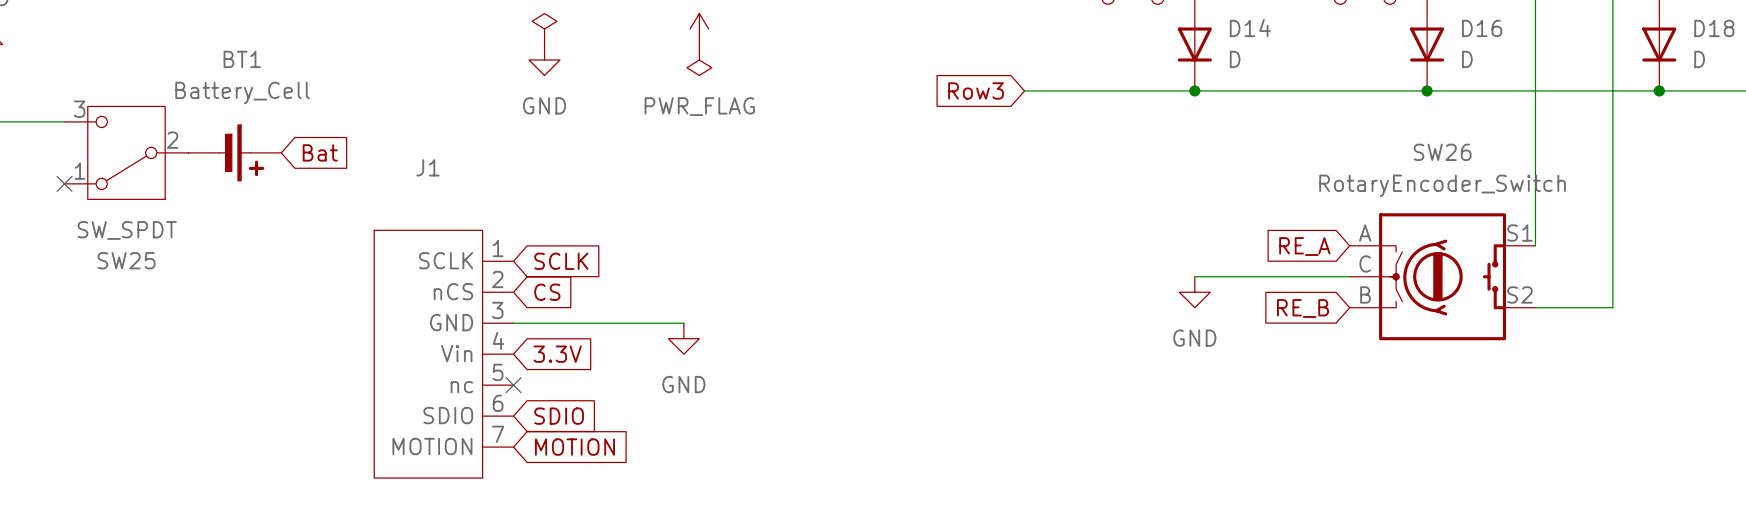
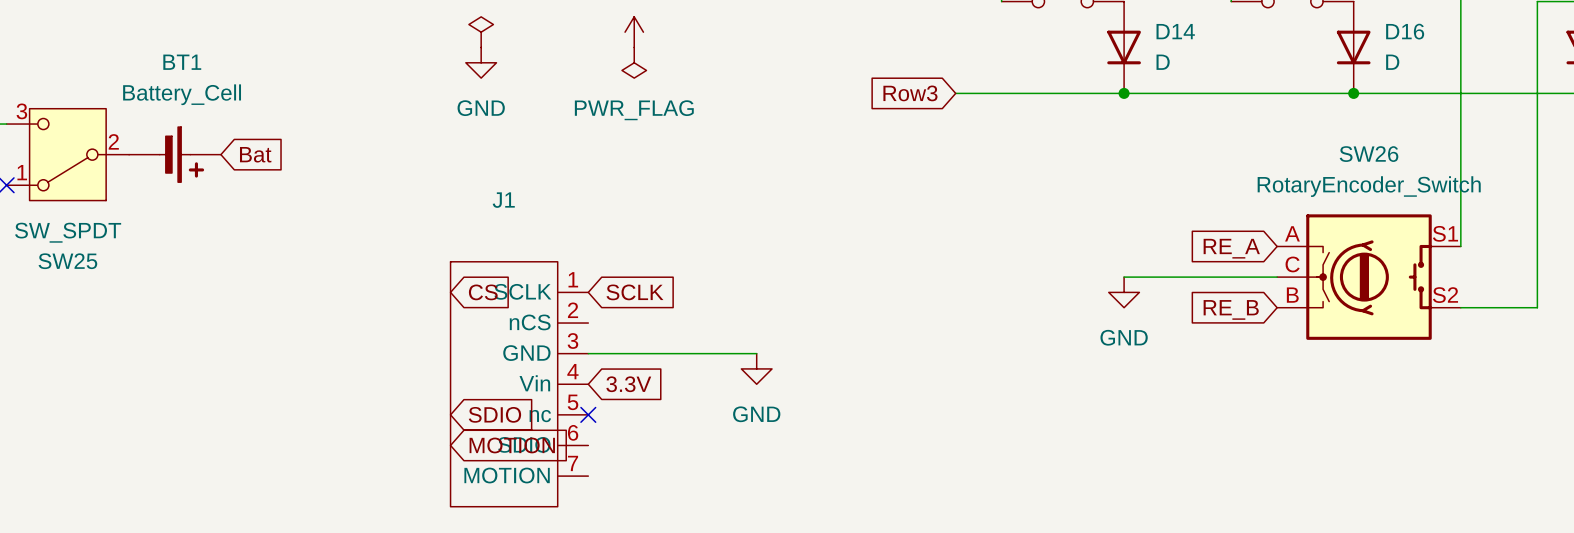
global label position: SCLK (561, 261) -> SCLK (634, 292)
wire: (513, 323) (683, 323) -> (588, 353) (756, 353)
power symbol position: GND (683, 338) -> GND (756, 368)
J1 position: (443, 354) -> (519, 384)
global label position: 3.3V (557, 354) -> 3.3V (628, 384)
no-connect mark: (513, 385) -> none
no-connect mark: none -> (588, 414)

